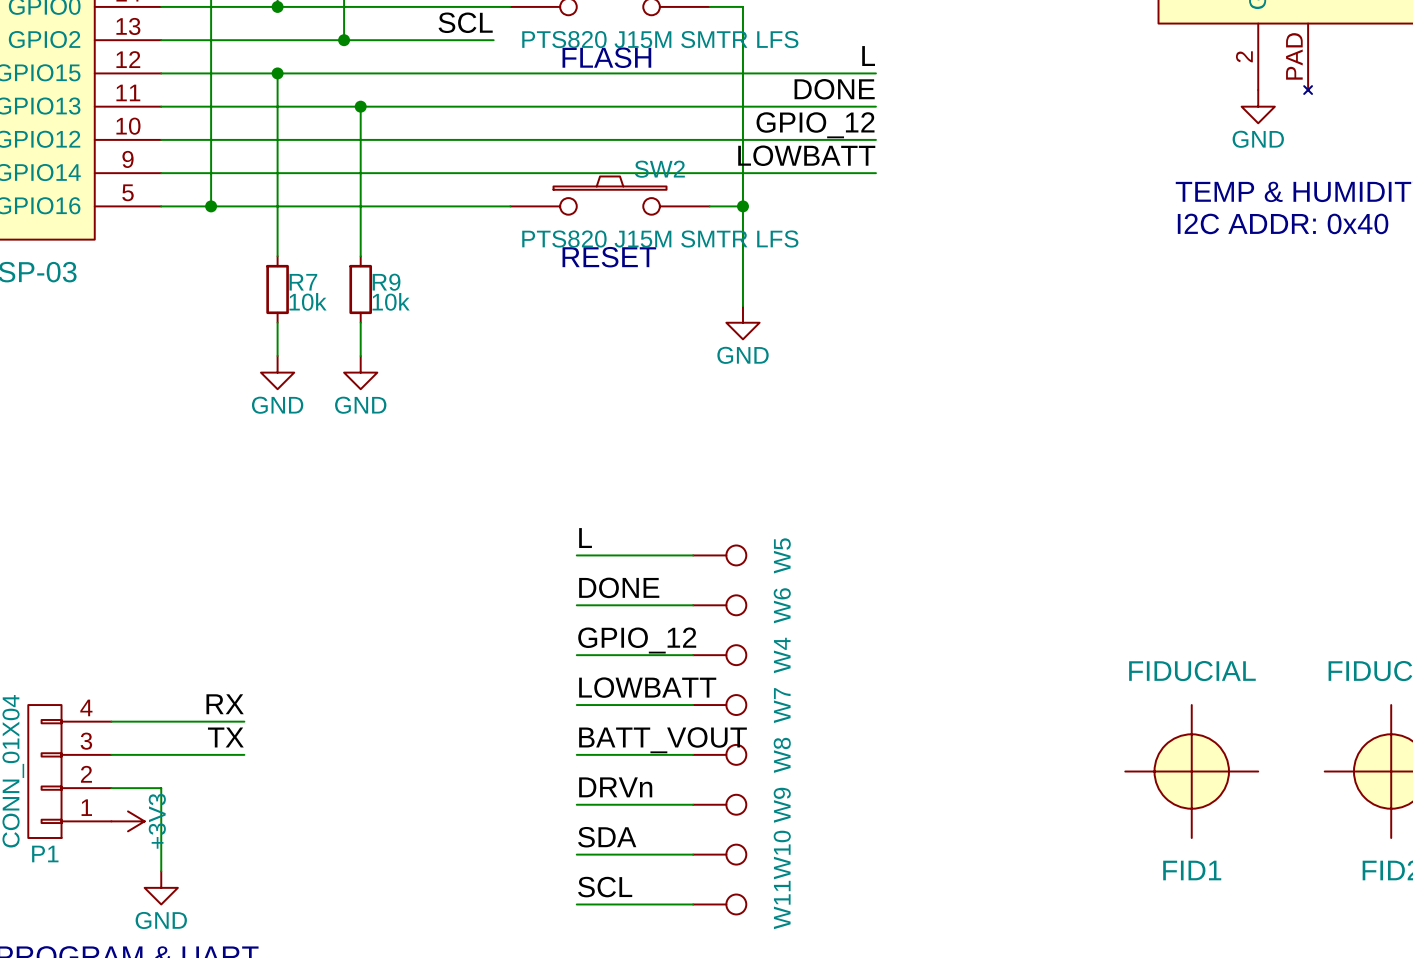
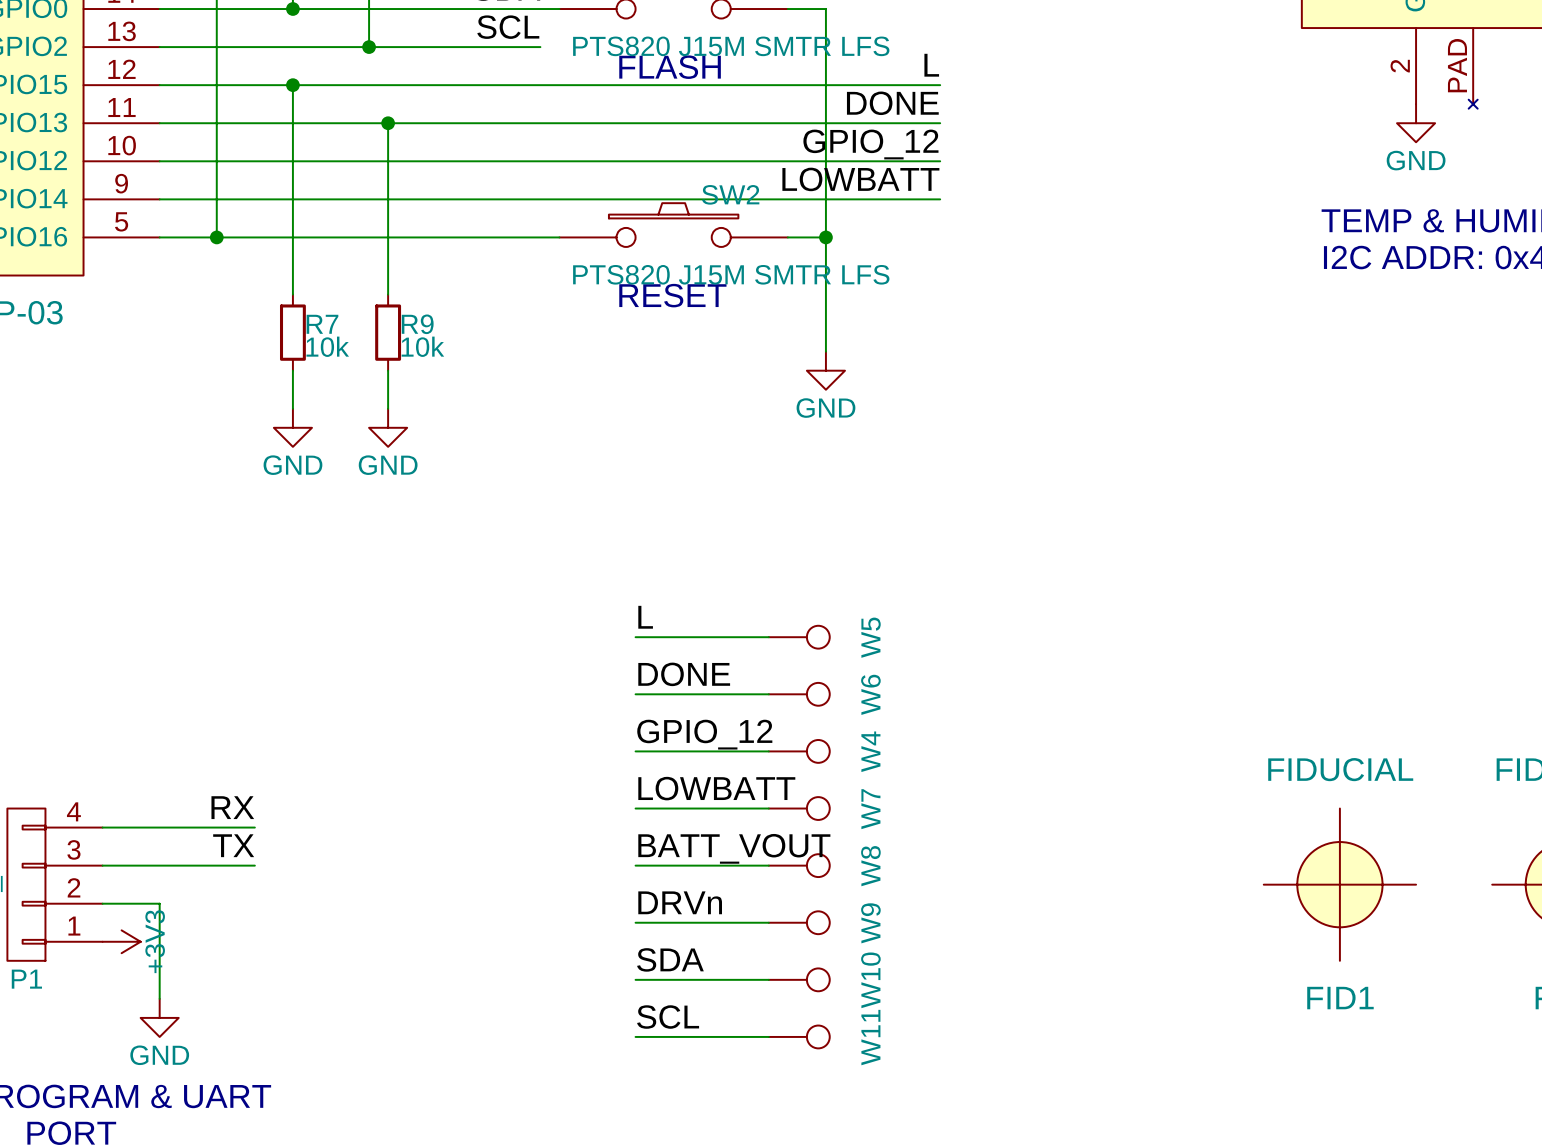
label position: L (868, 56) -> L (931, 65)
wire: (842, 73) (875, 73) -> none
label position: DONE (834, 89) -> DONE (892, 103)
wire: (842, 106) (875, 106) -> none
label position: GPIO_12 (815, 125) -> GPIO_12 (870, 144)
wire: (842, 139) (875, 139) -> none
label position: LOWBATT (806, 155) -> LOWBATT (860, 179)
wire: (842, 173) (875, 173) -> none

